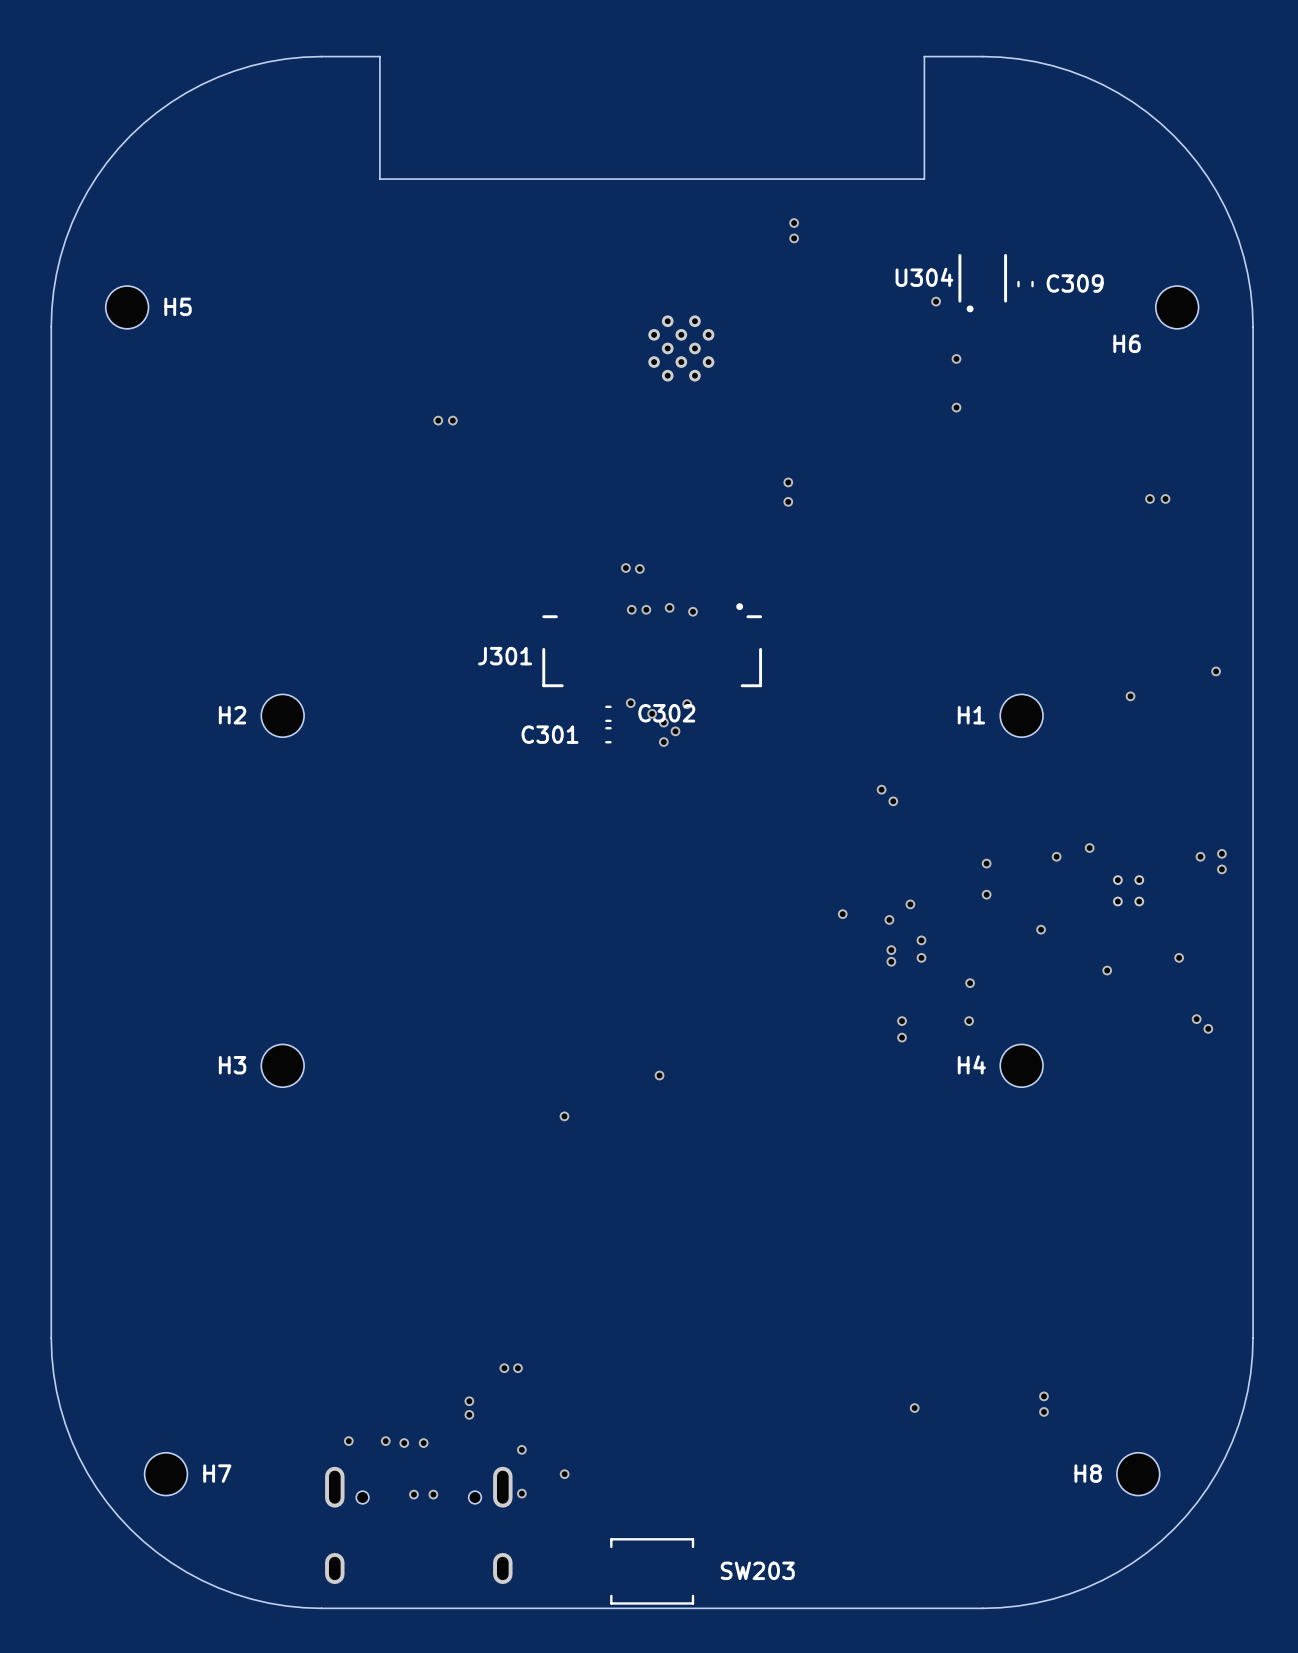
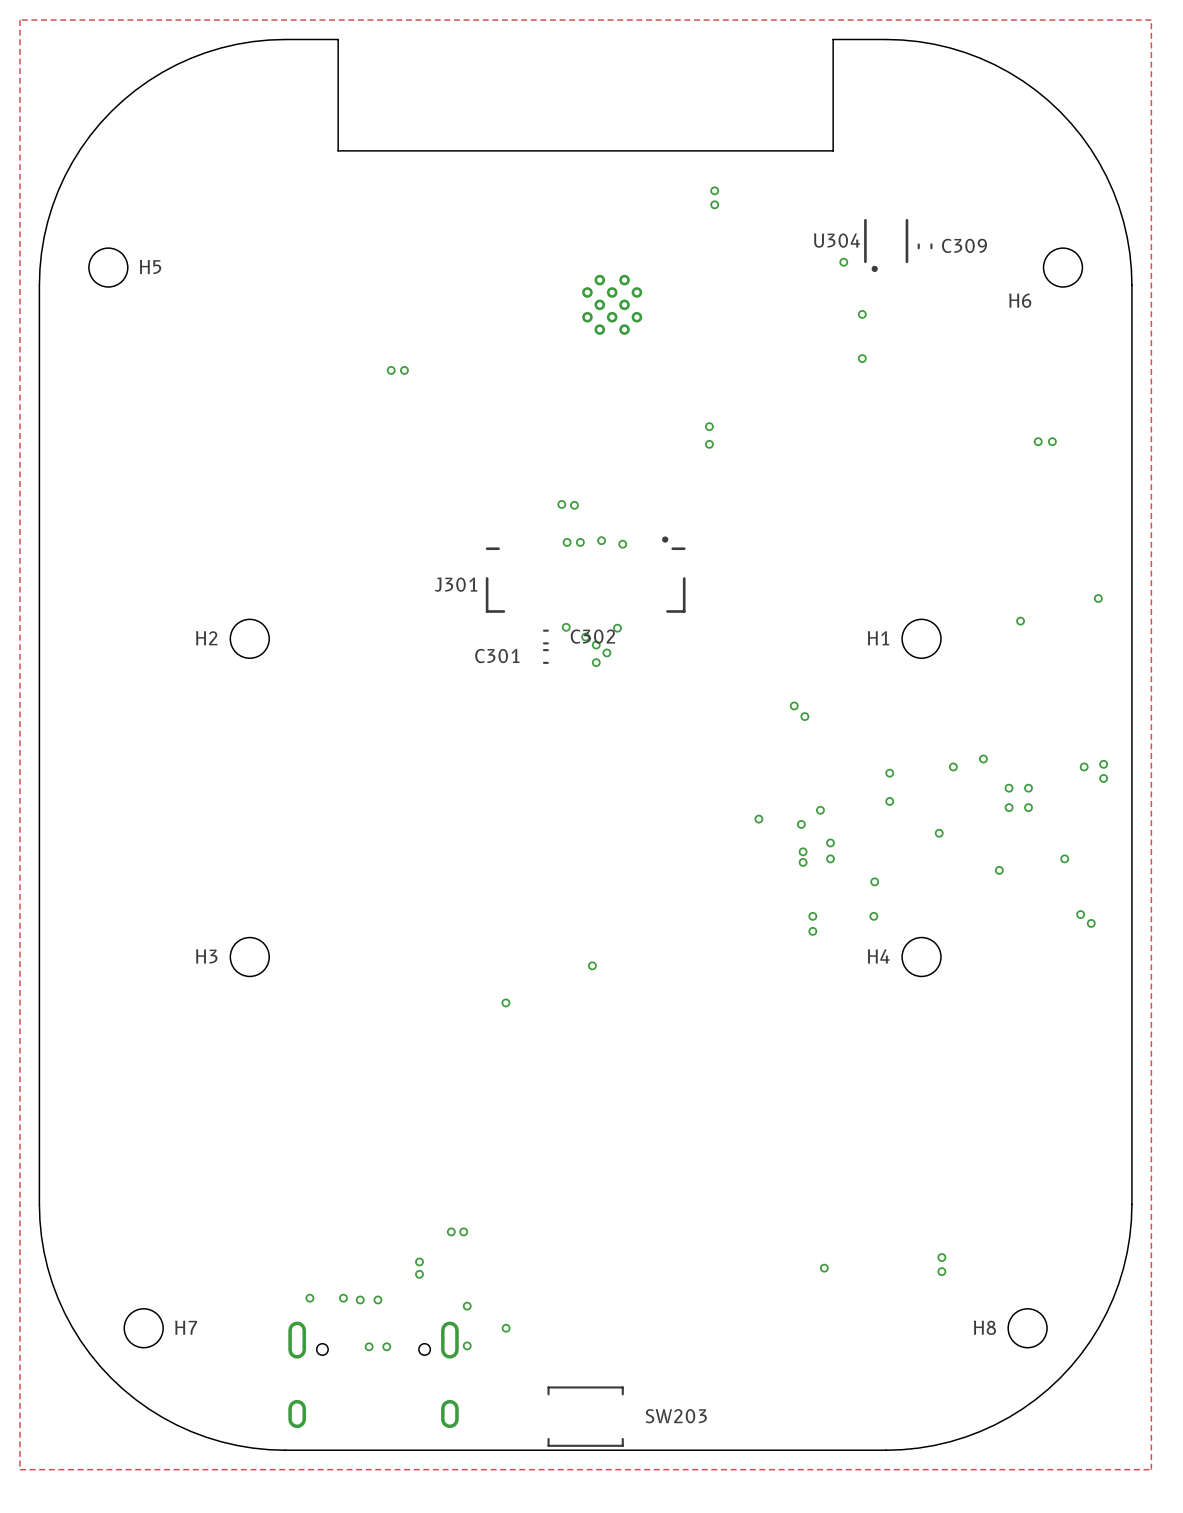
zone outline: none -> (19, 20) (1151, 20) (1151, 1469) (19, 1469) (19, 20)

